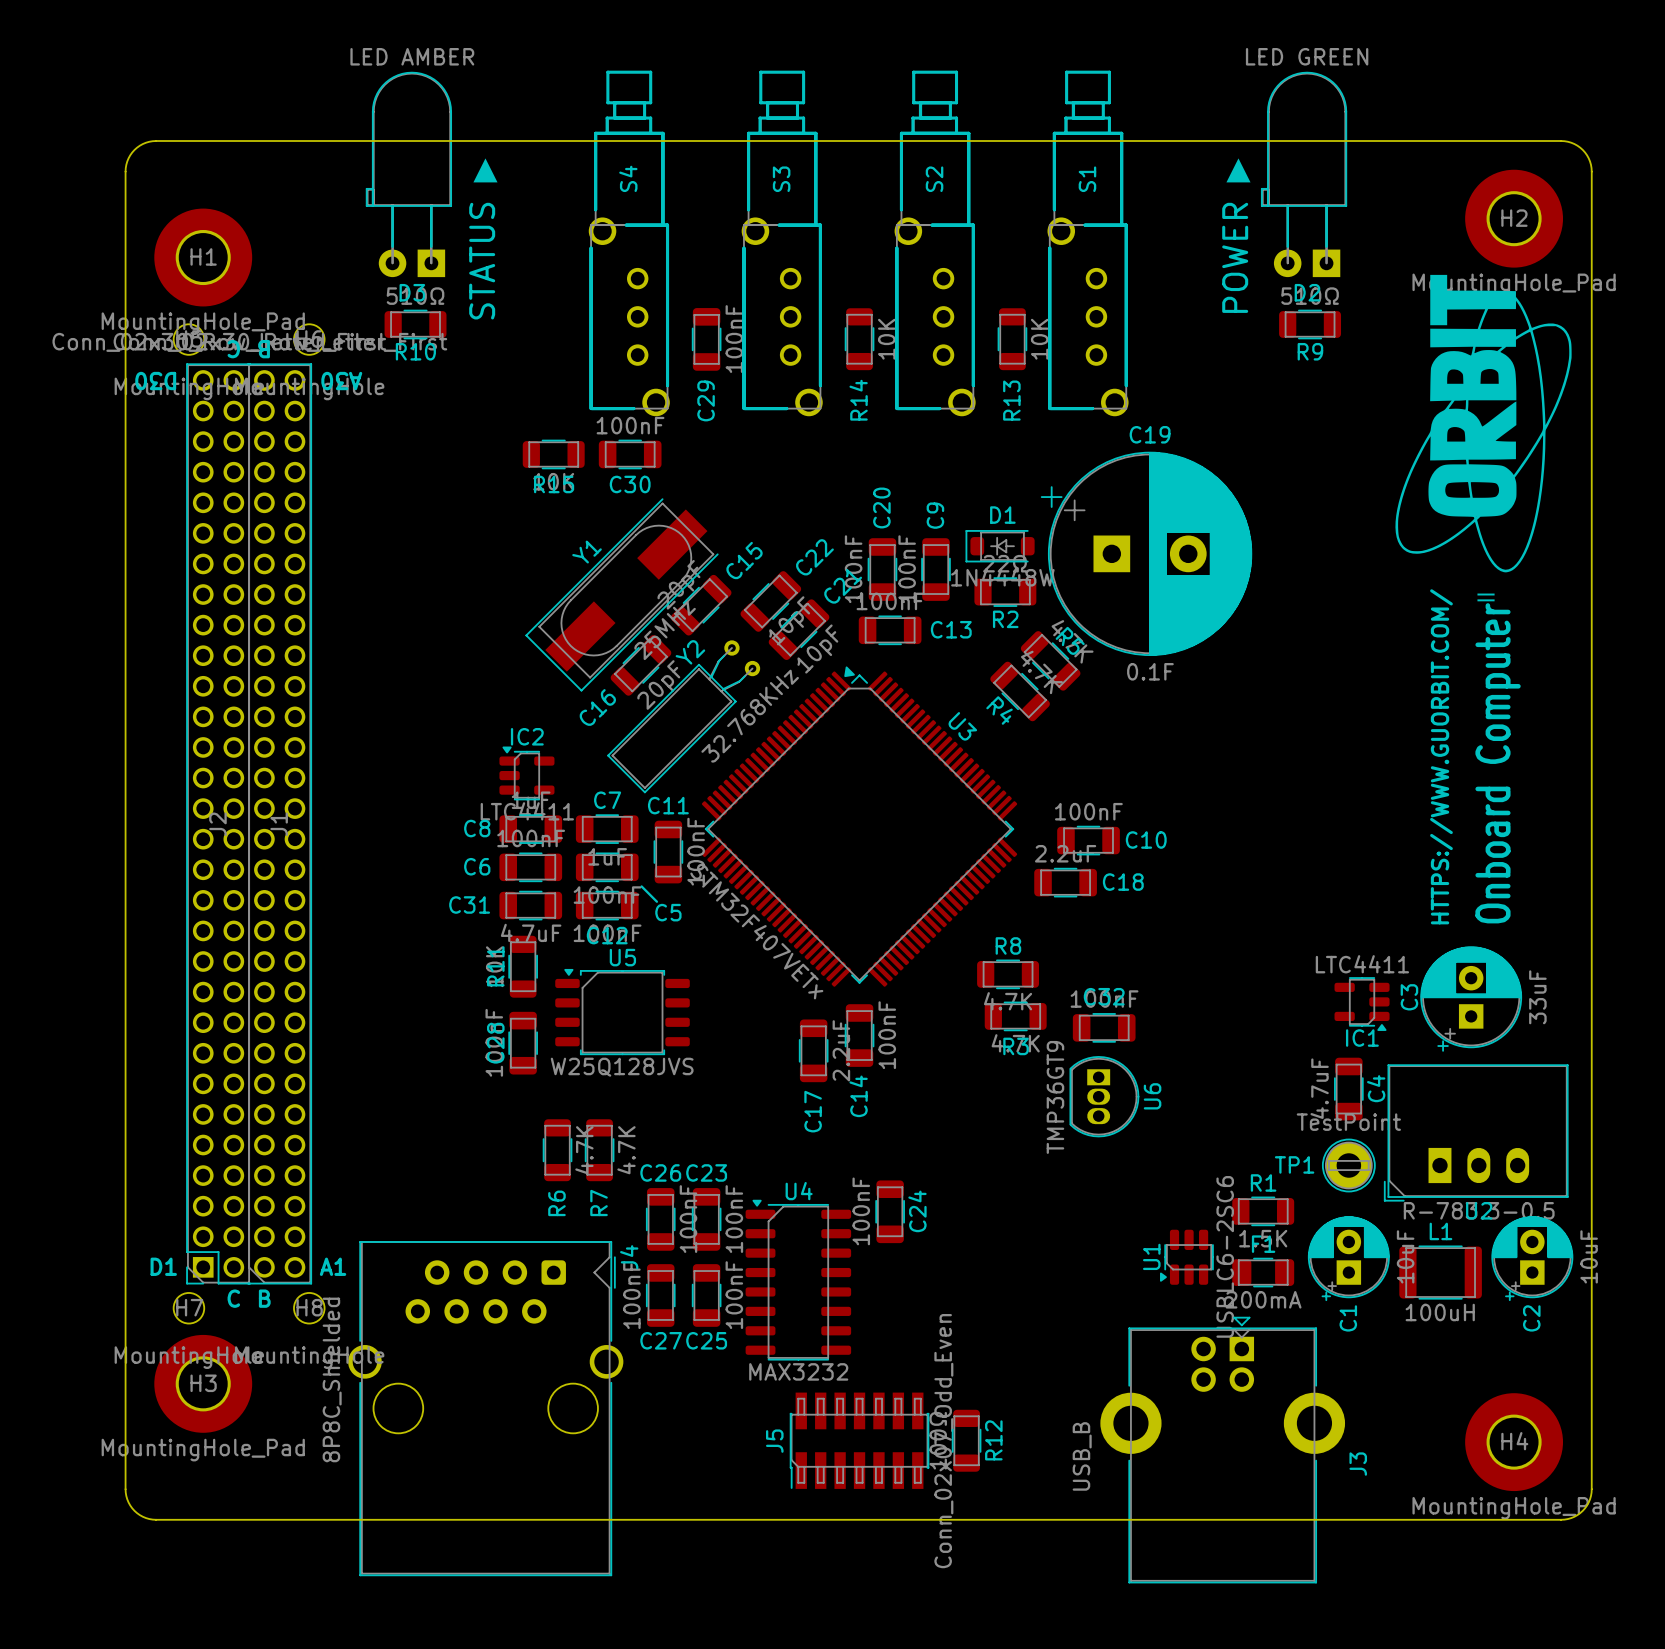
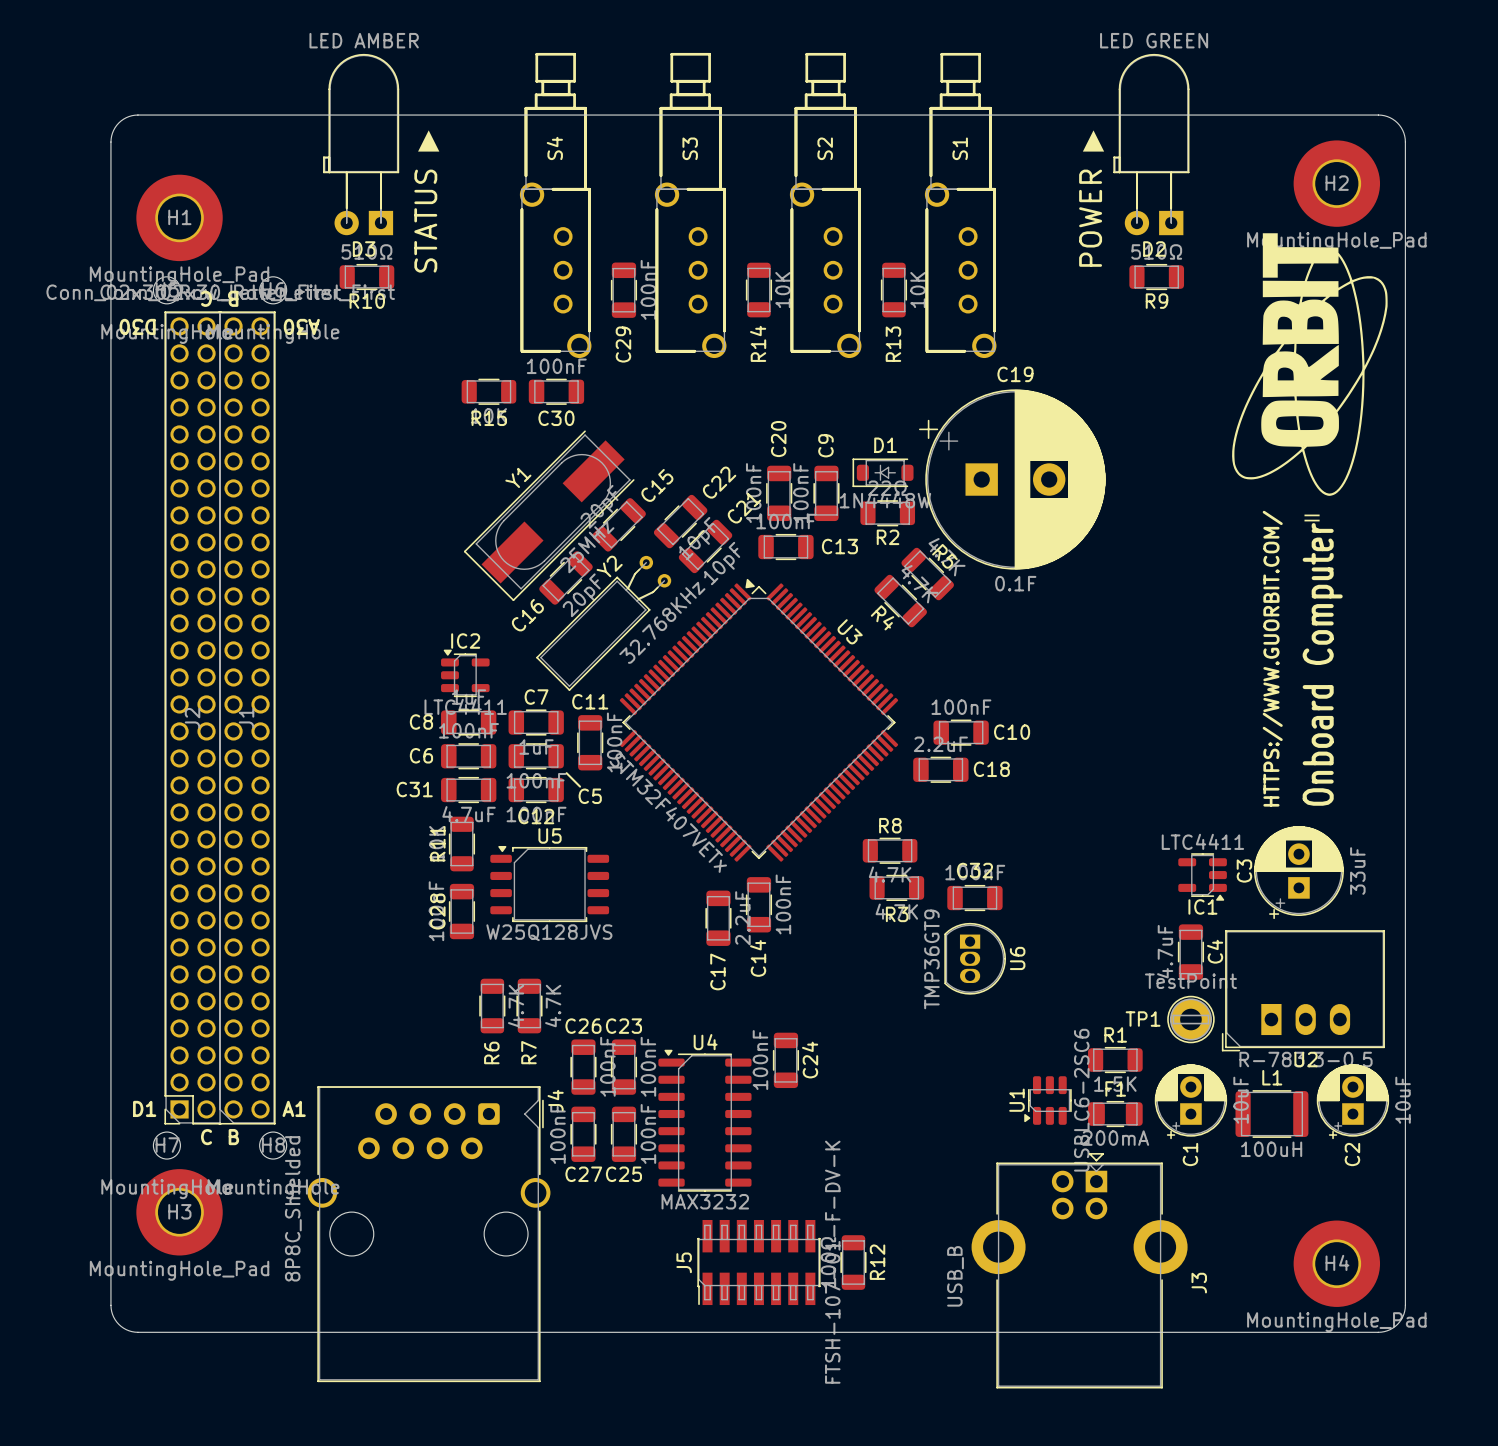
J5 value: Conn_02x07_Odd_Even (943, 1441) -> FTSH-107-01-F-DV-K (832, 1262)

